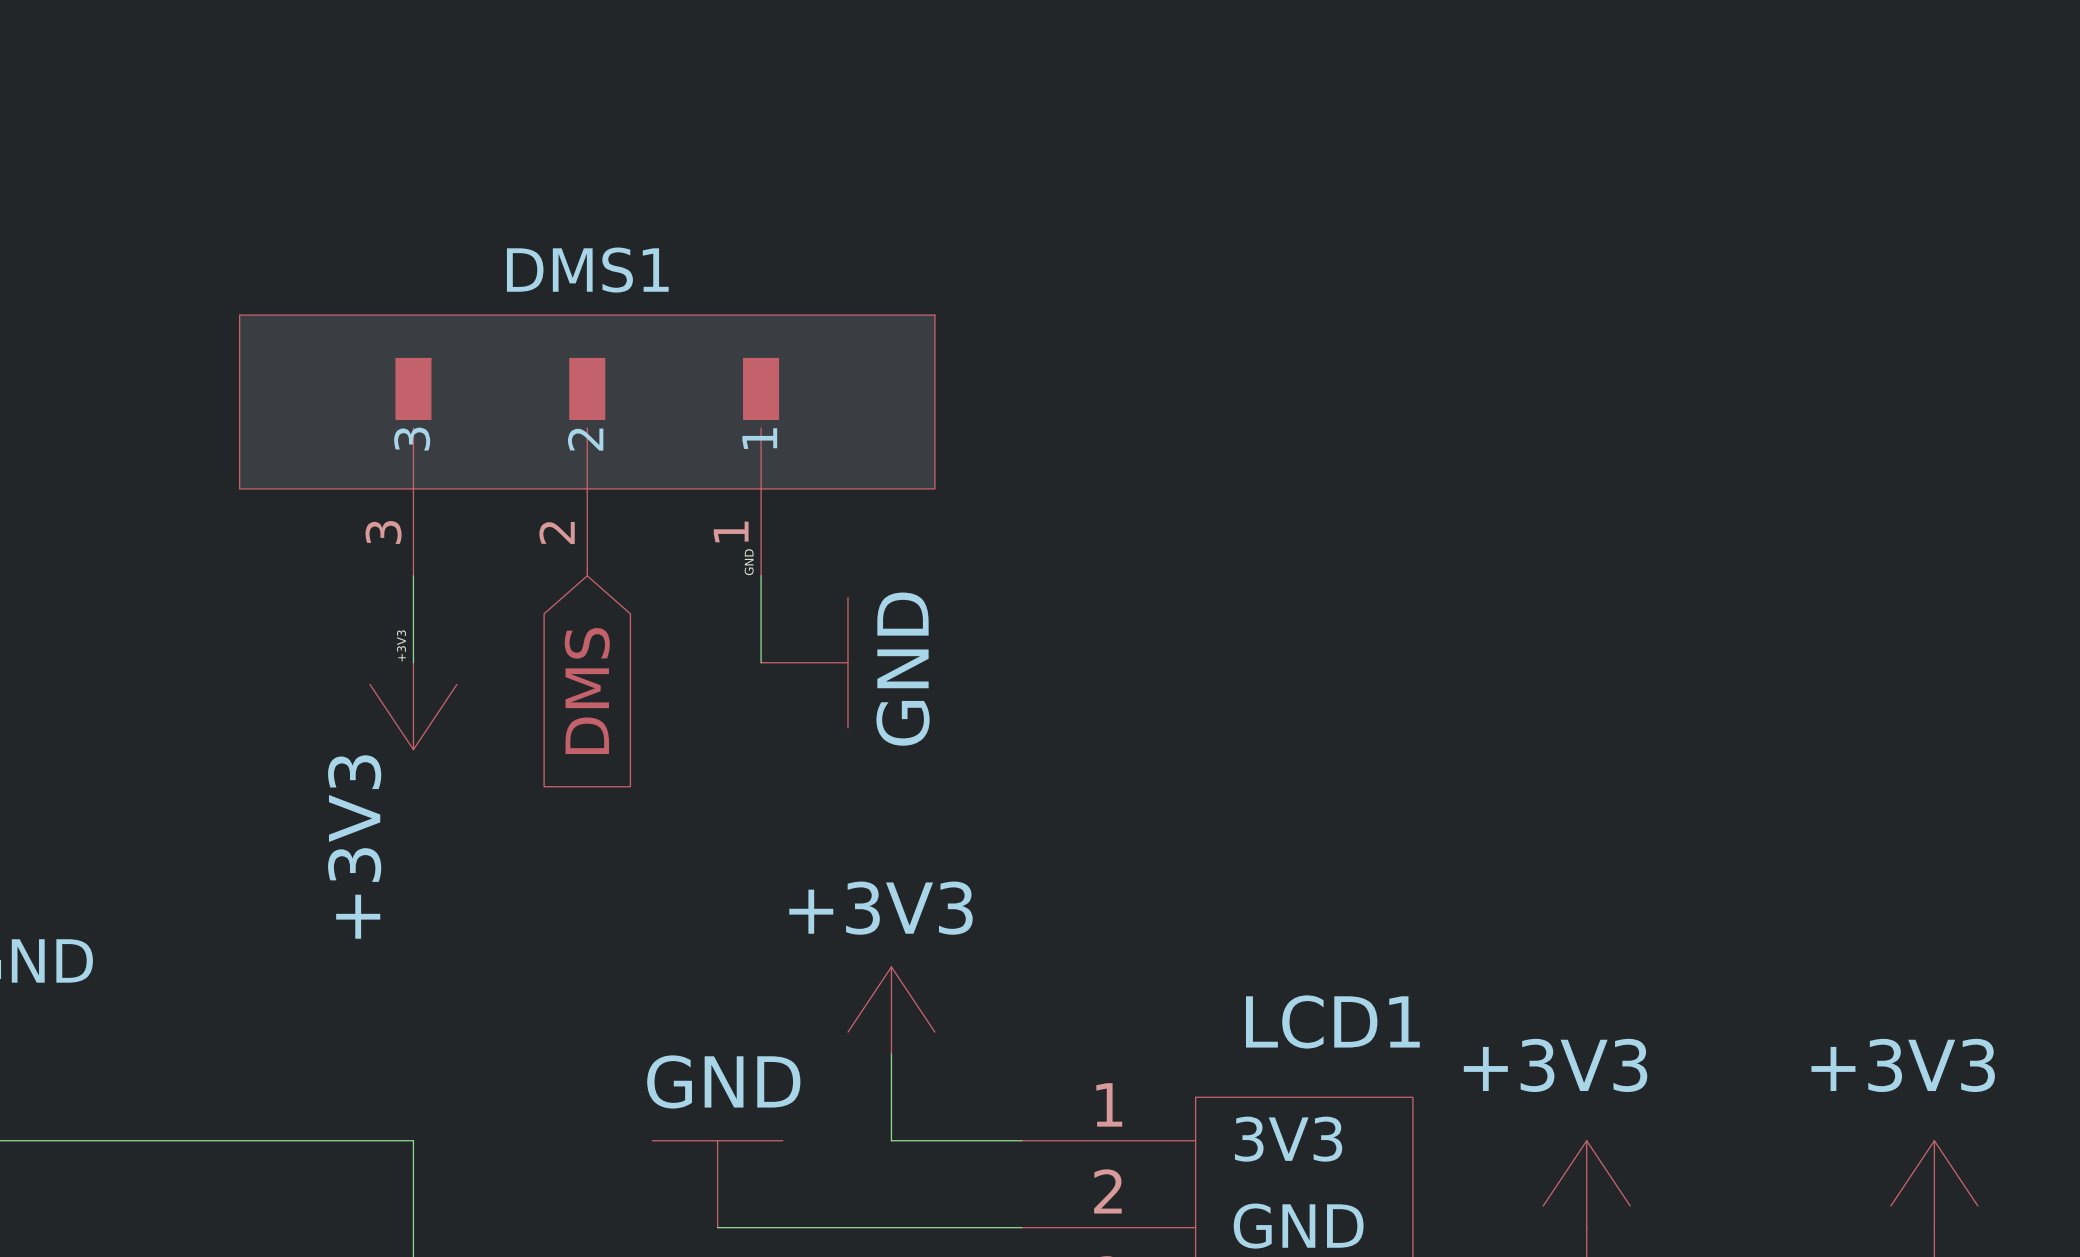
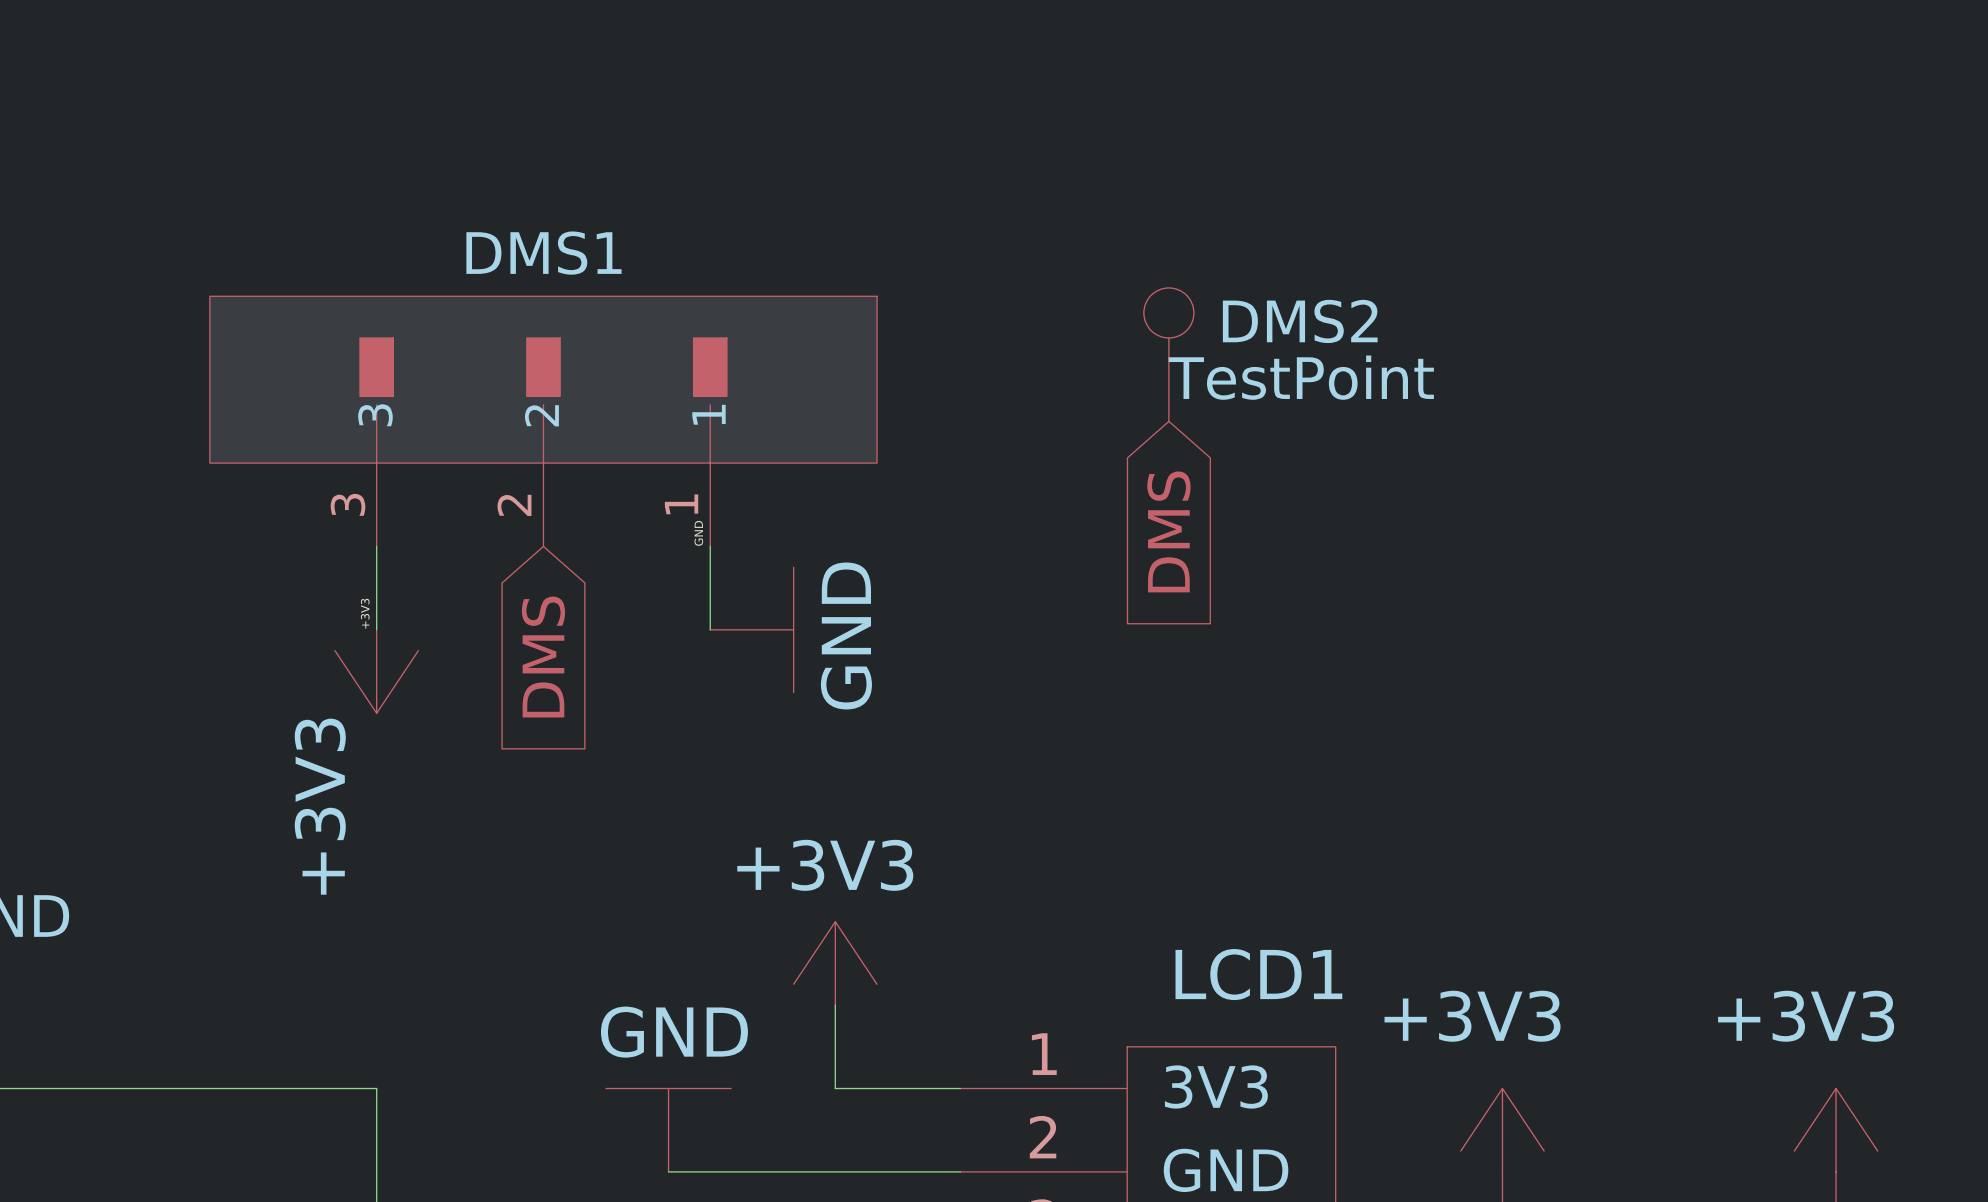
DMS2: none -> TestPoint (1168, 354)
global label: none -> DMS (1168, 531)

